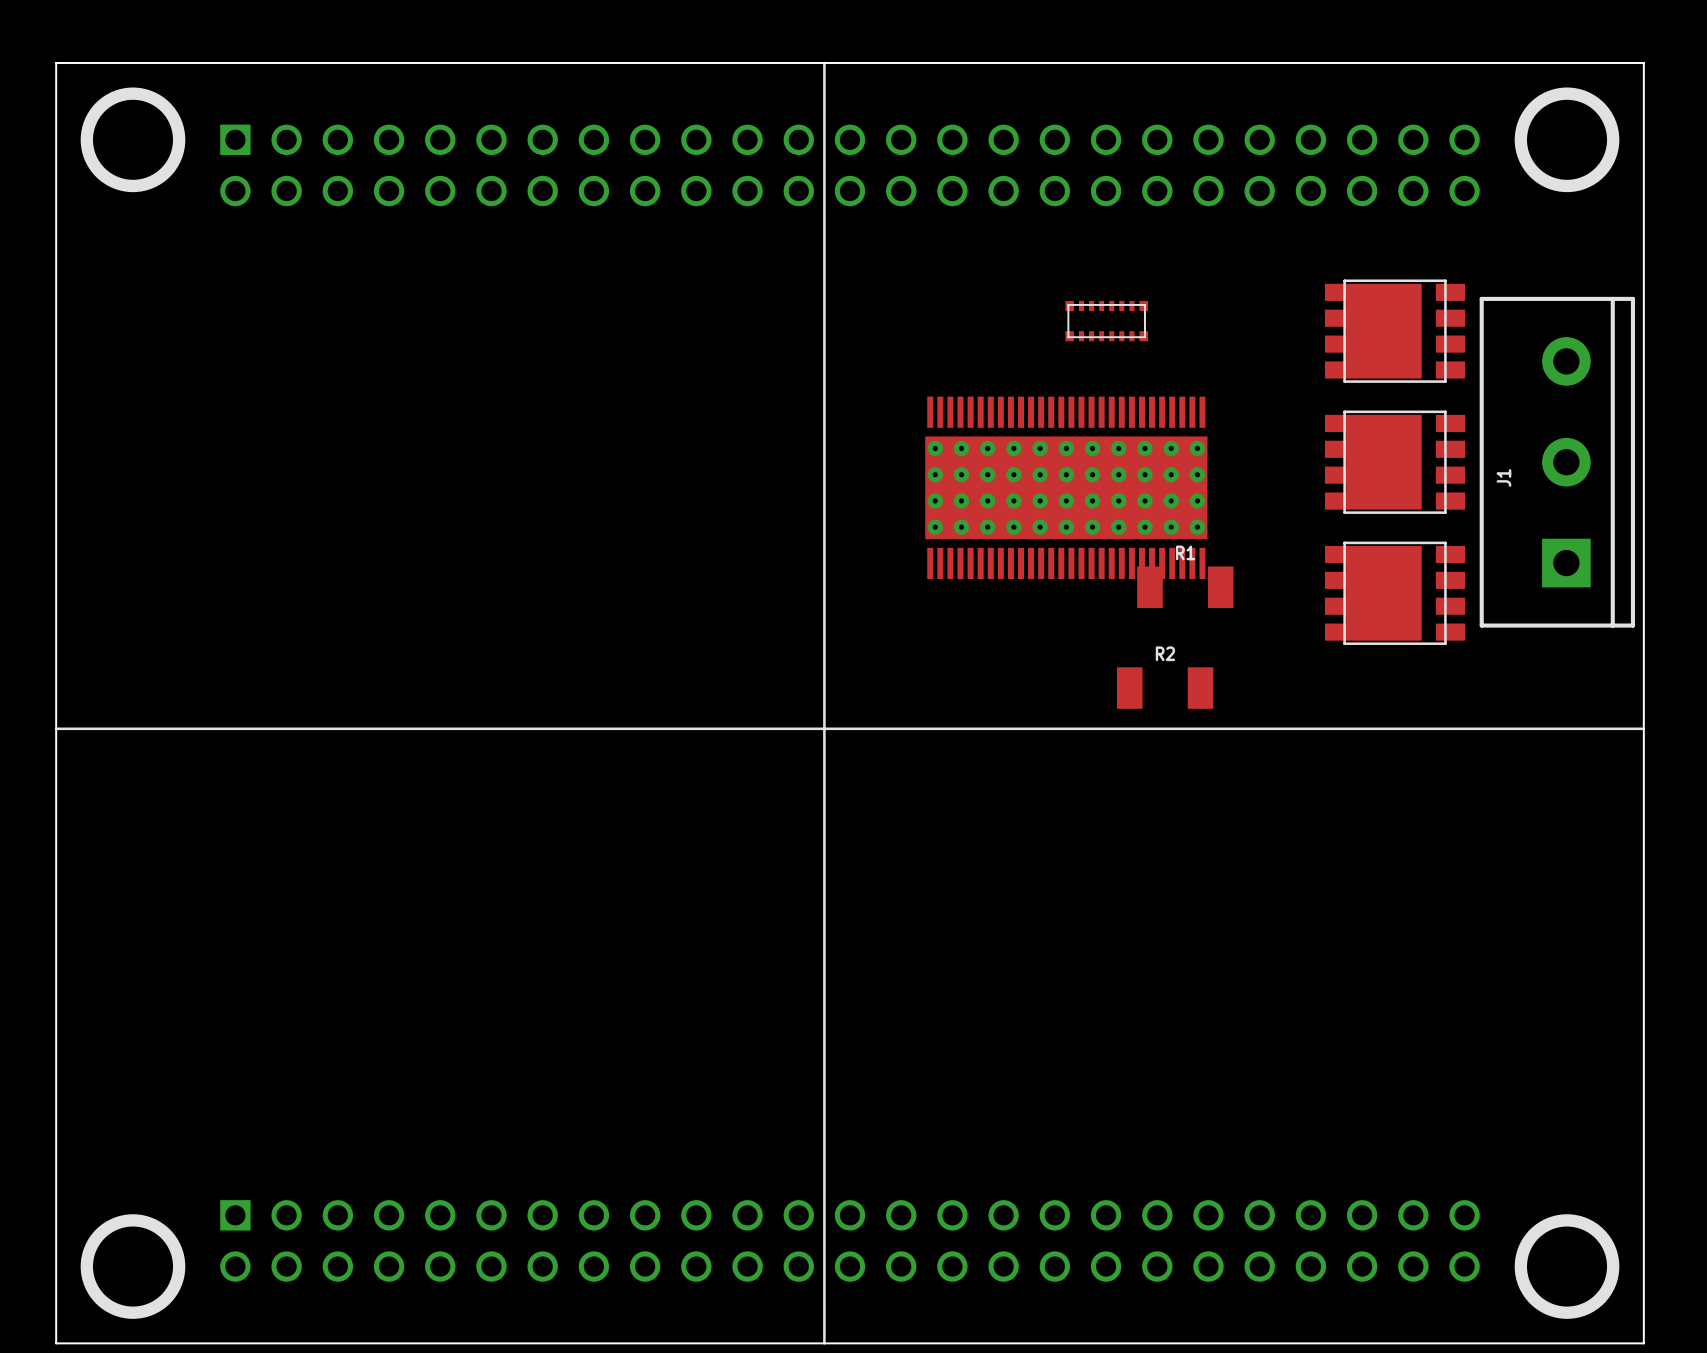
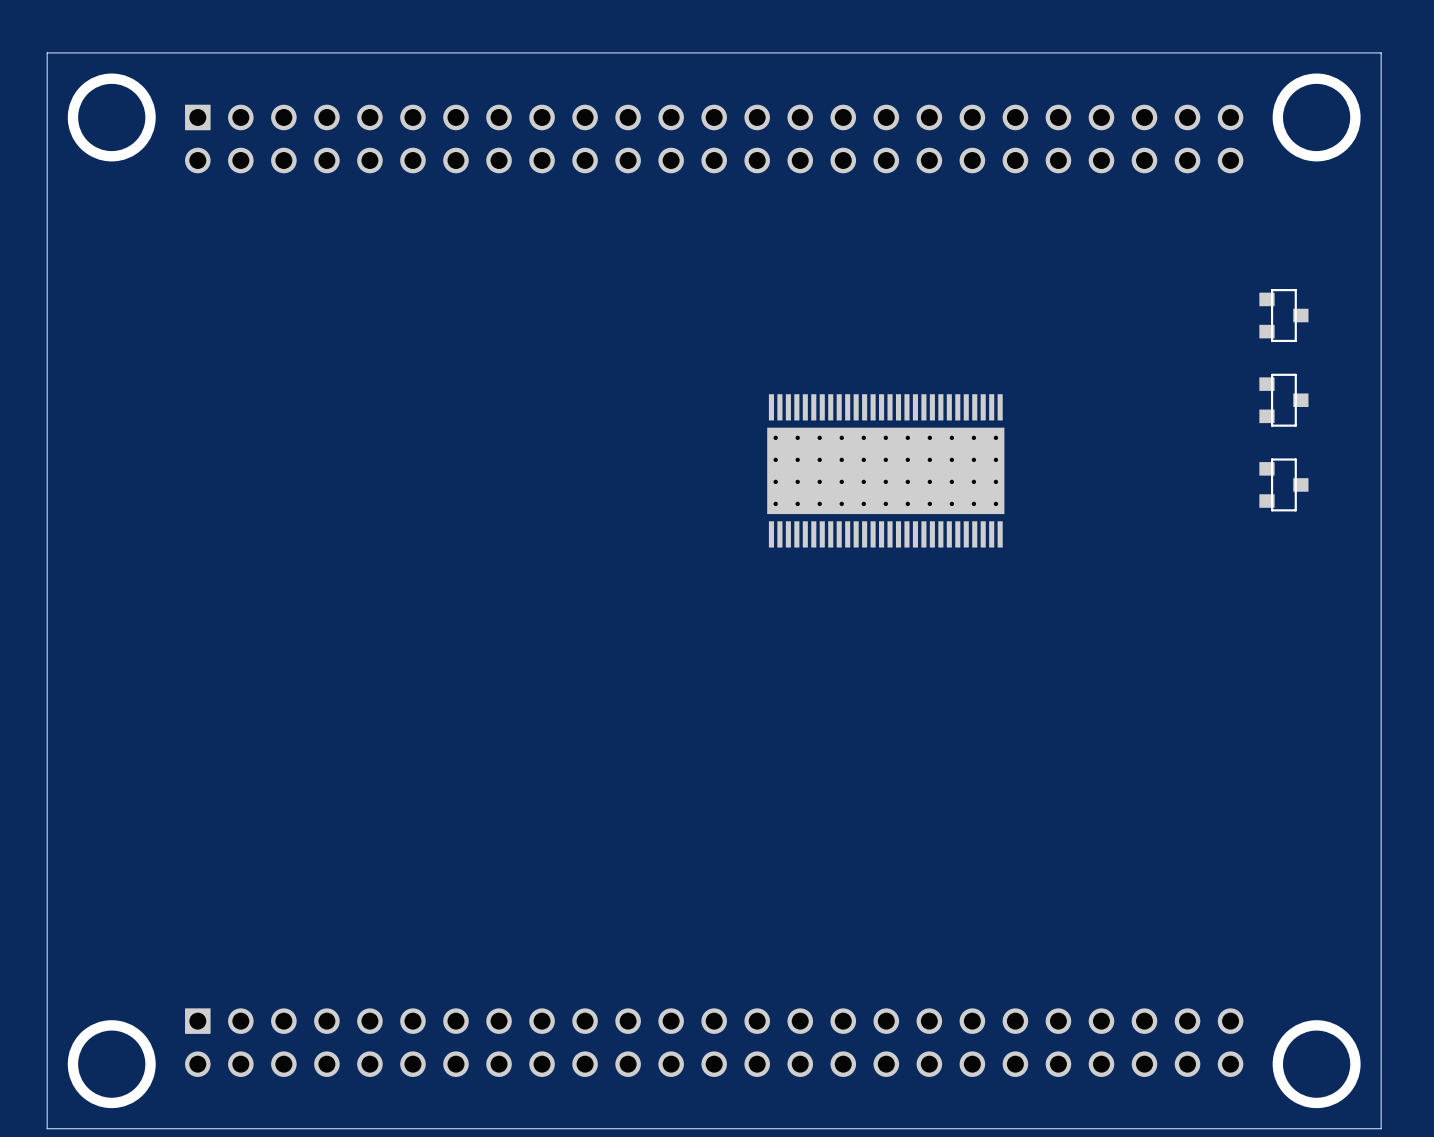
line: (824, 62) (824, 1343) -> none
part: (1106, 321) -> none
part: (1395, 331) -> none
part: none -> (1283, 315)
part: (1395, 462) -> none
J1: (1557, 462) -> none
part: none -> (1283, 400)
part position: (1066, 487) -> (885, 470)
part: none -> (1283, 484)
R1: (1185, 587) -> none
part: (1395, 593) -> none
R2: (1165, 688) -> none
line: (56, 728) (1643, 728) -> none

